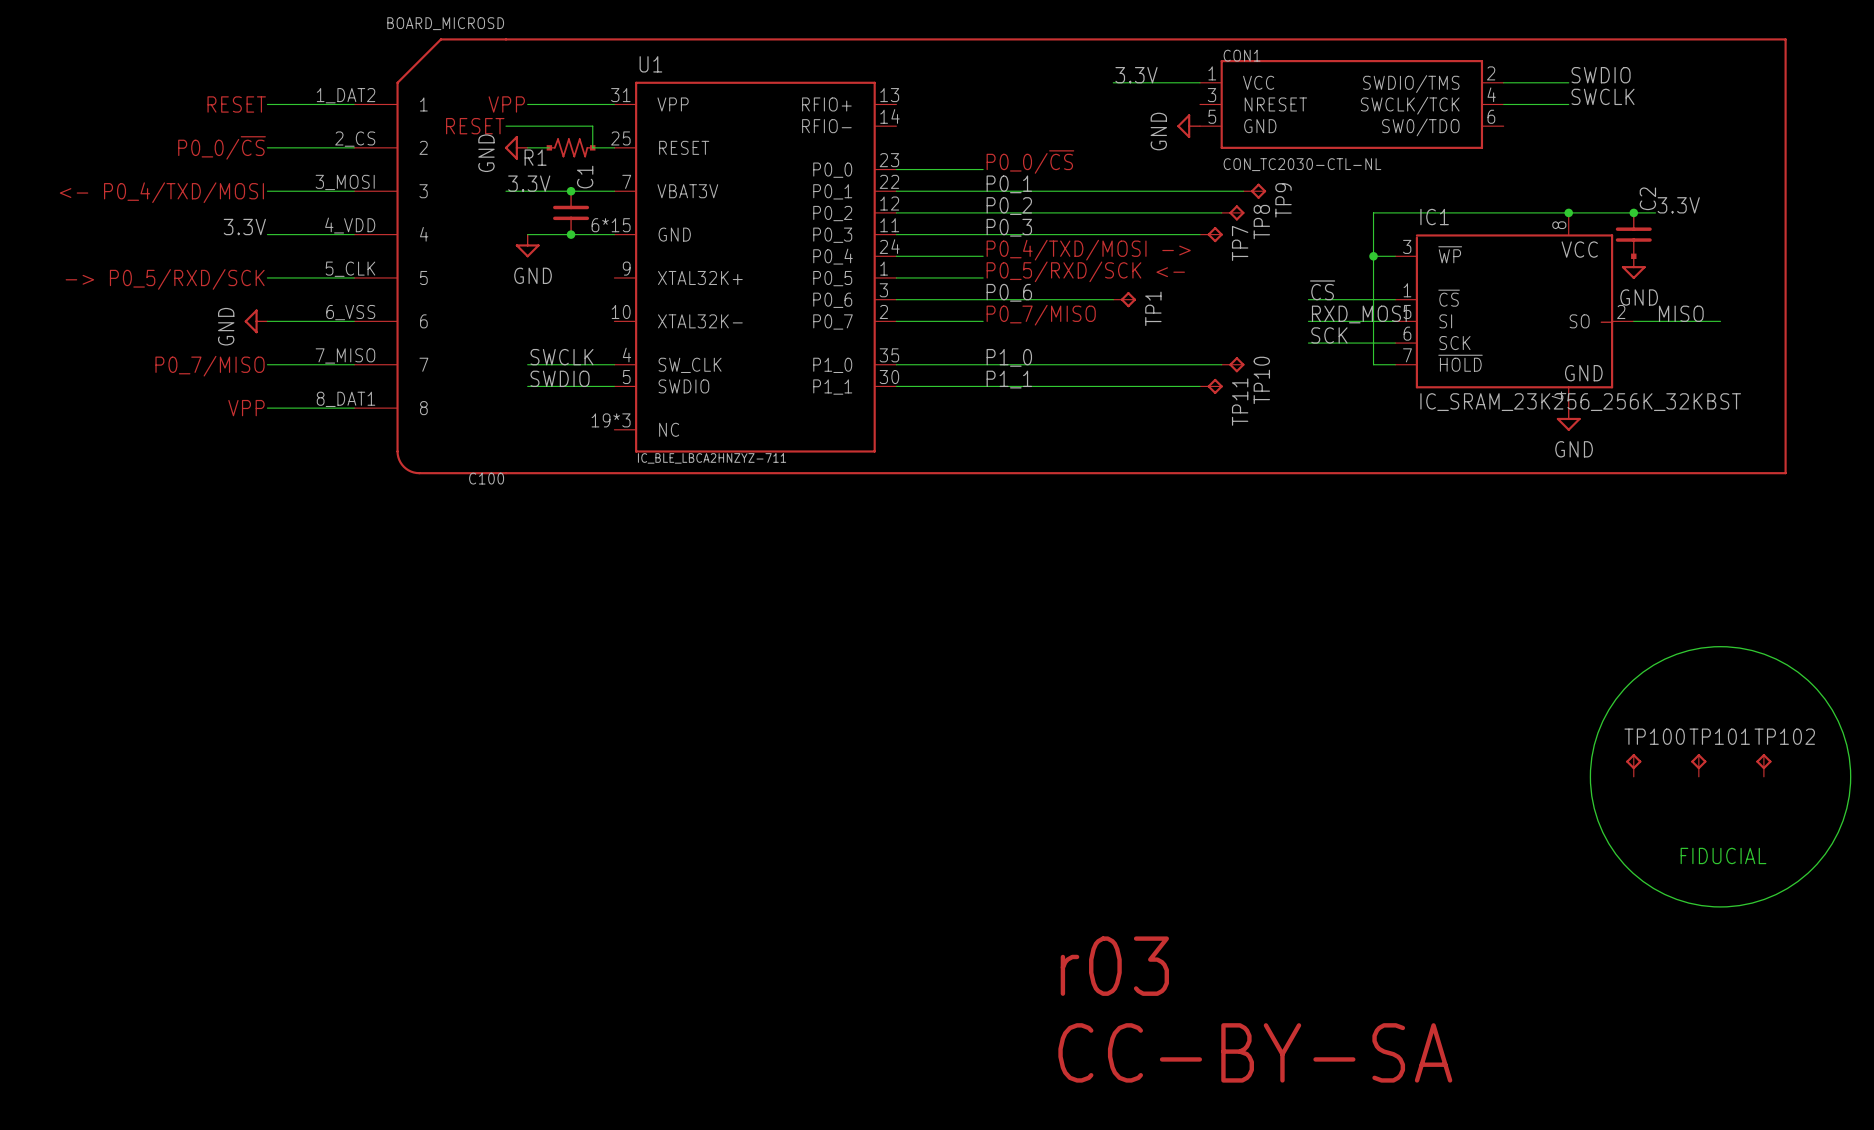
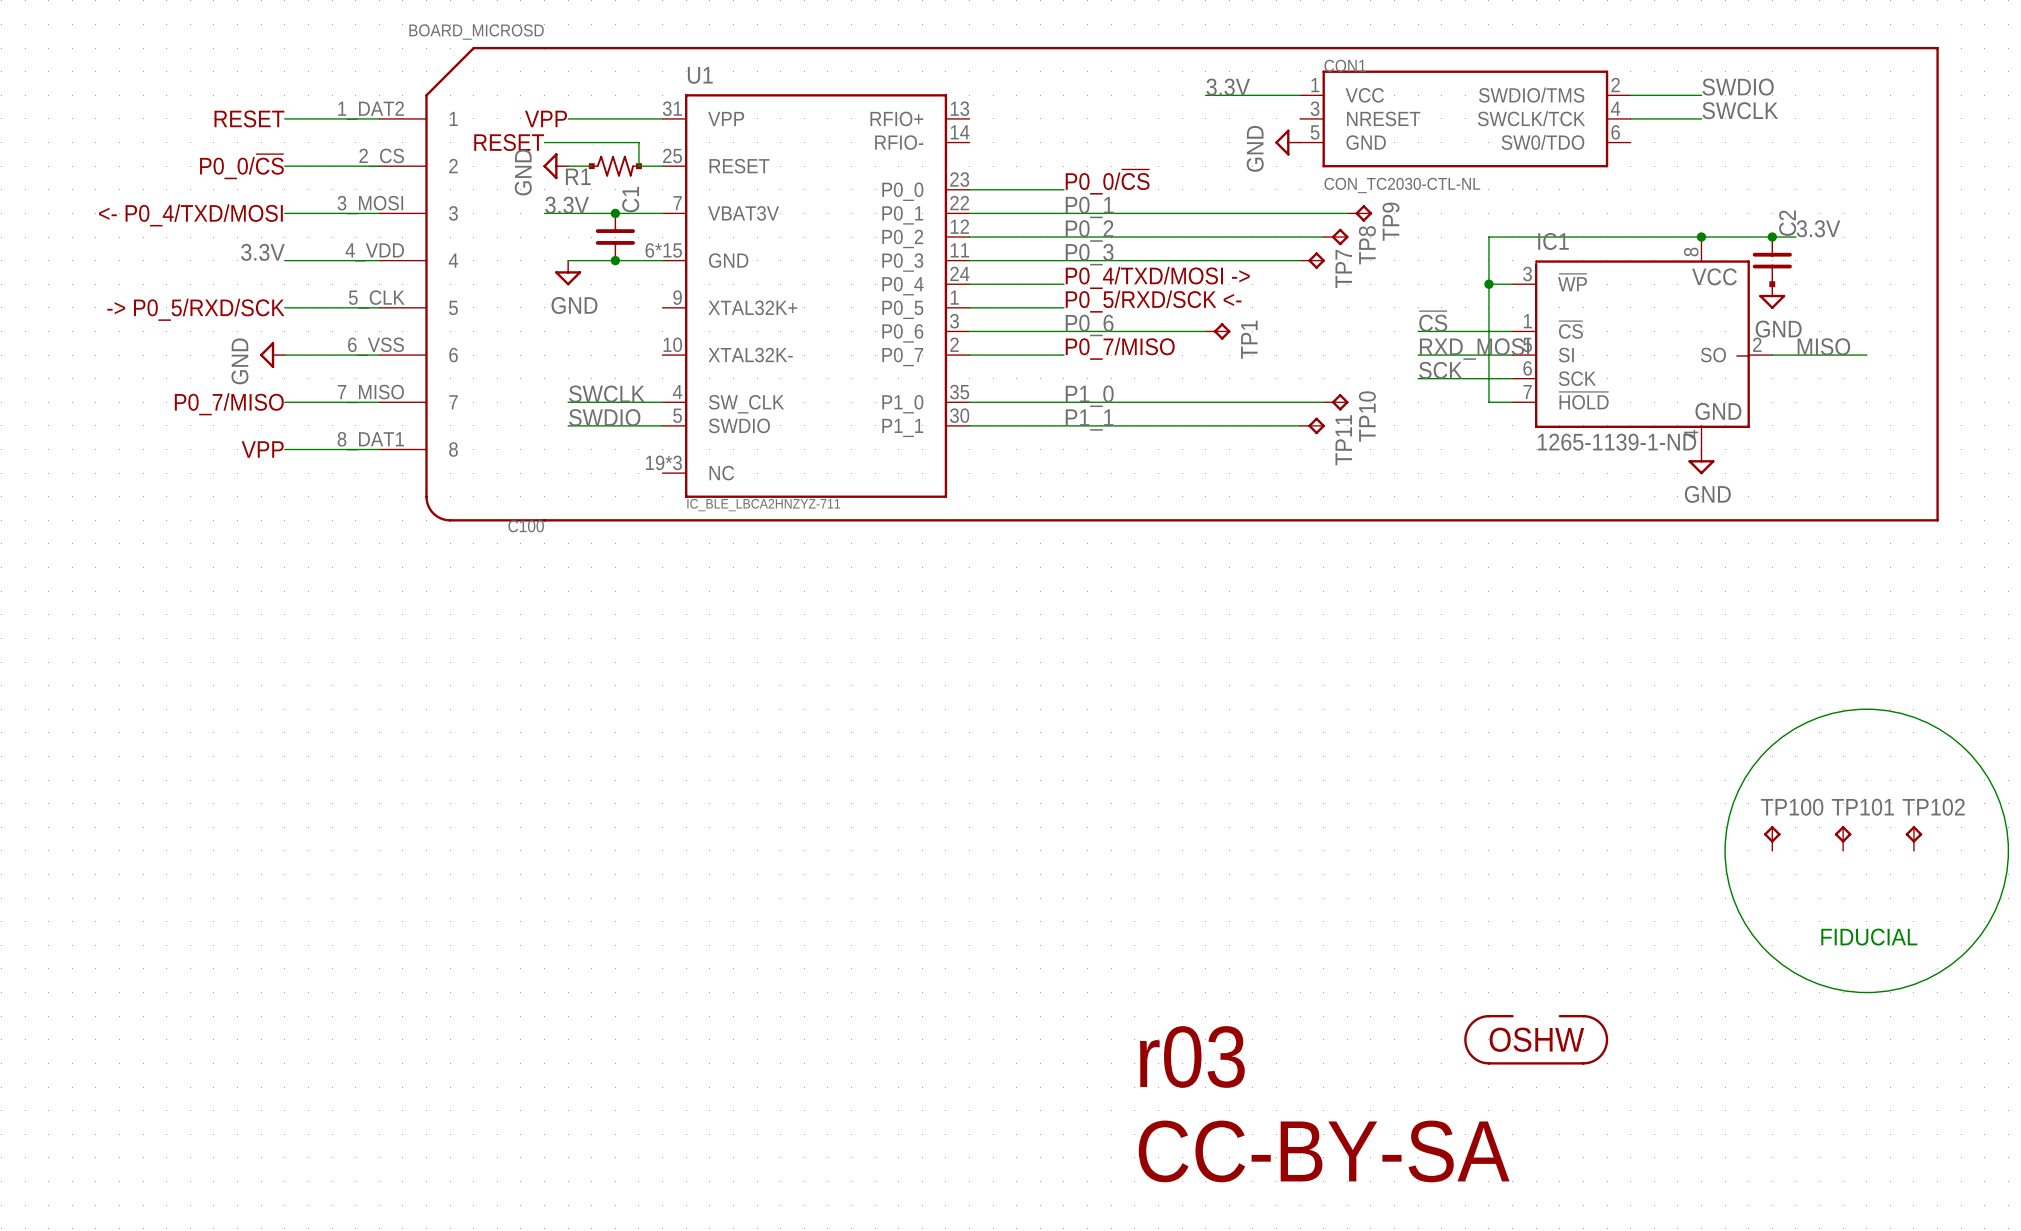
IC1 value: IC_SRAM_23K256_256K_32KBST (1580, 402) -> 1265-1139-1-ND (1617, 442)
part: none -> (1536, 1039)

